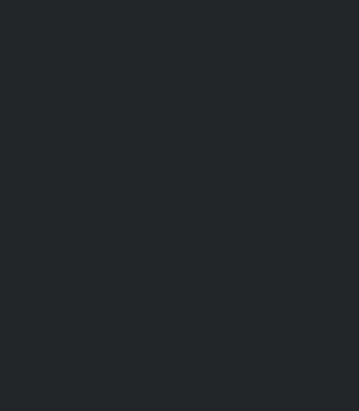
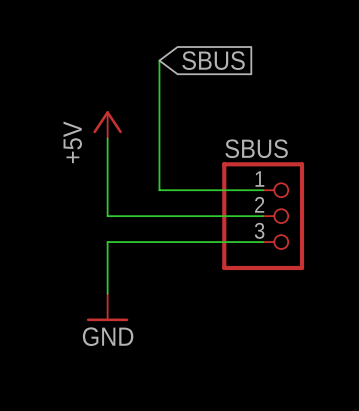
wire: none -> (159, 60) (159, 190) (263, 190)
global label: none -> SBUS (213, 60)
power symbol: none -> +5V (107, 124)
wire: none -> (107, 138) (107, 216) (263, 216)
SBUS: none -> (263, 216)
wire: none -> (263, 242) (107, 242) (107, 293)
power symbol: none -> GND (107, 307)

